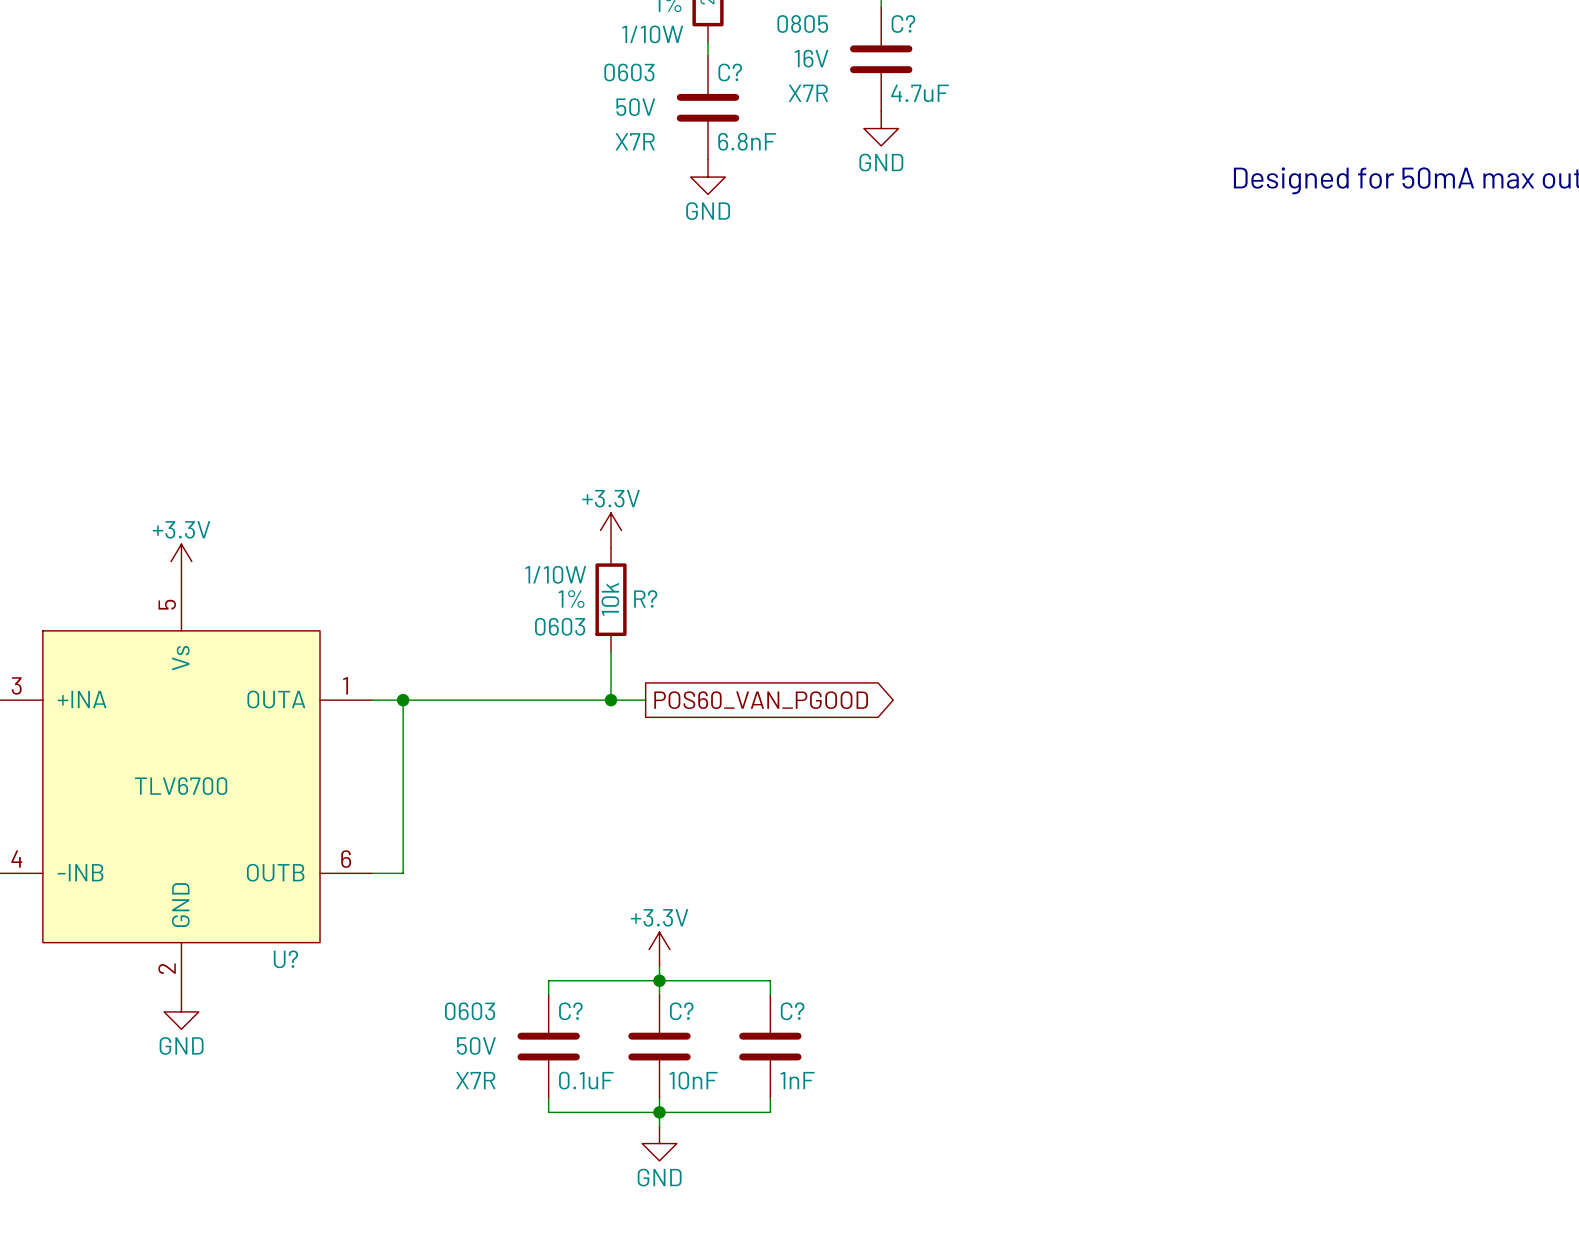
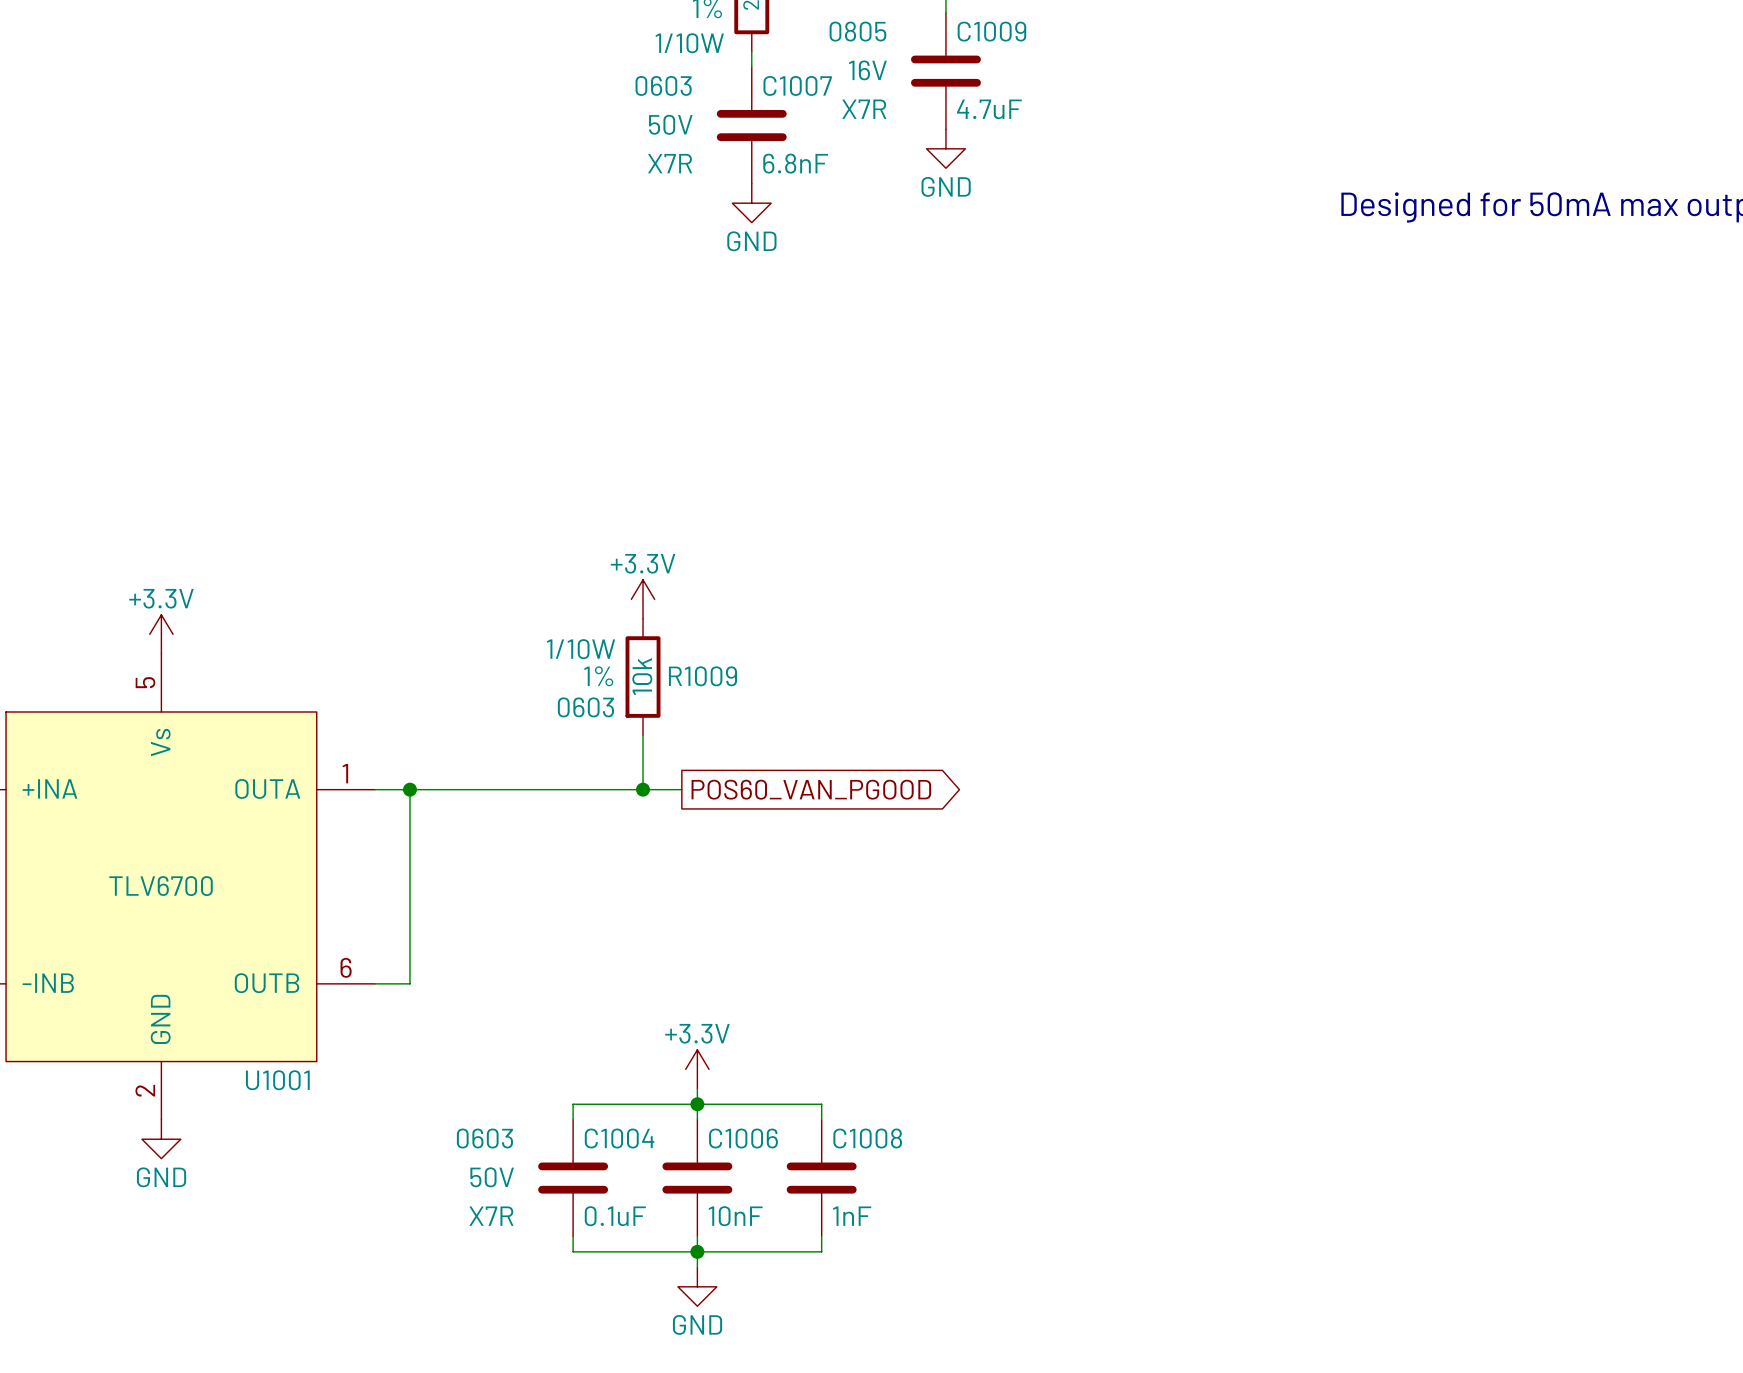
C? name: C? (903, 23) -> C1009 (991, 31)
C? name: C? (730, 72) -> C1007 (797, 85)
R? name: R? (645, 598) -> R1009 (702, 676)
U? name: U? (285, 959) -> U1001 (277, 1080)
C? name: C? (570, 1011) -> C1004 (619, 1138)
C? name: C? (681, 1011) -> C1006 (743, 1138)
C? name: C? (792, 1011) -> C1008 (867, 1138)

